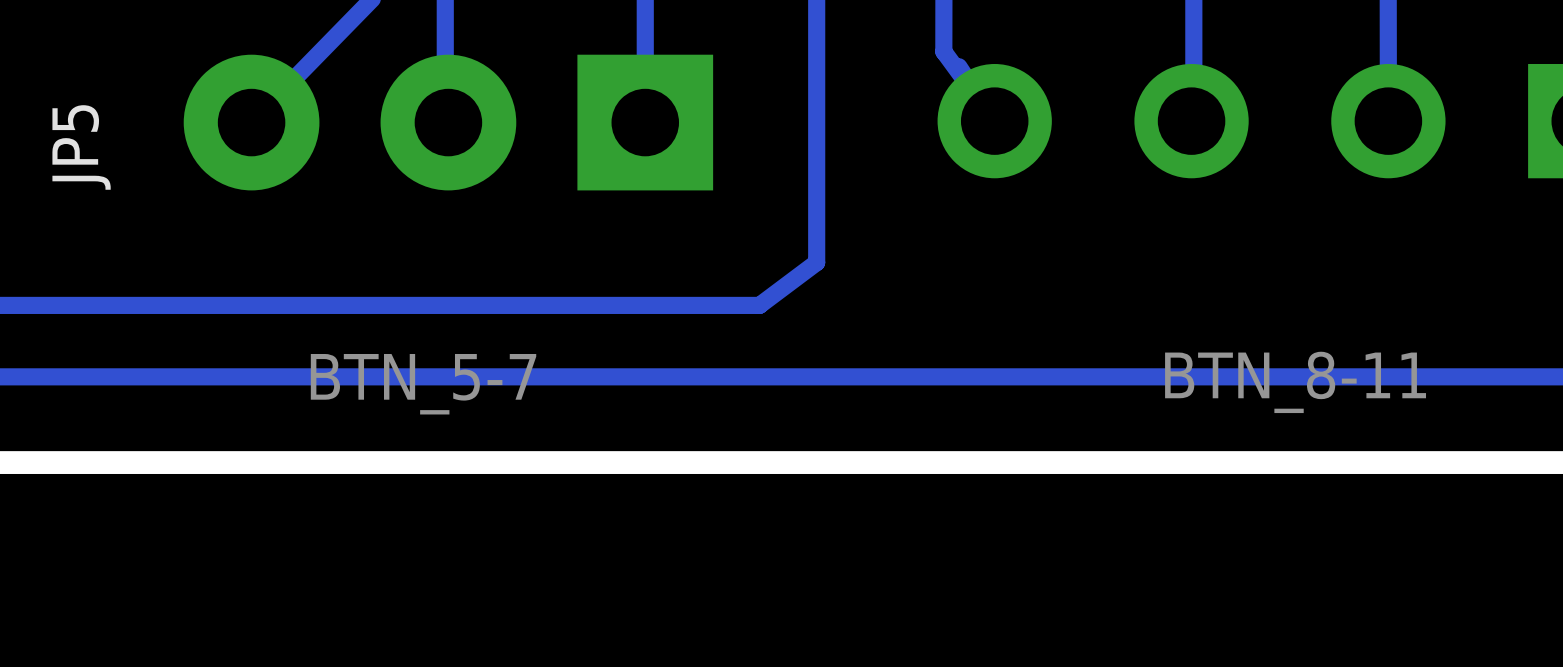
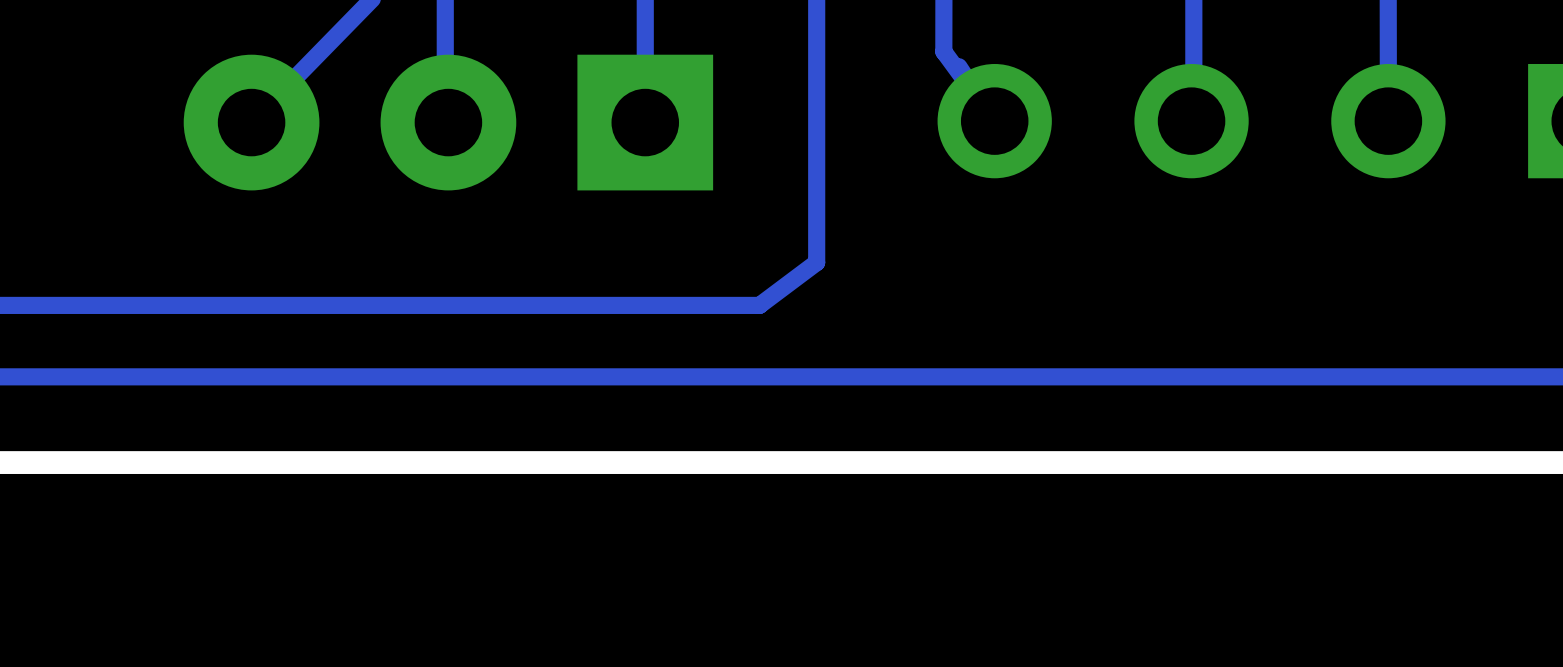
JP5 name: JP5 (81, 147) -> none
part value: BTN_8-11 (1295, 382) -> none
JP5 value: BTN_5-7 (423, 384) -> none

